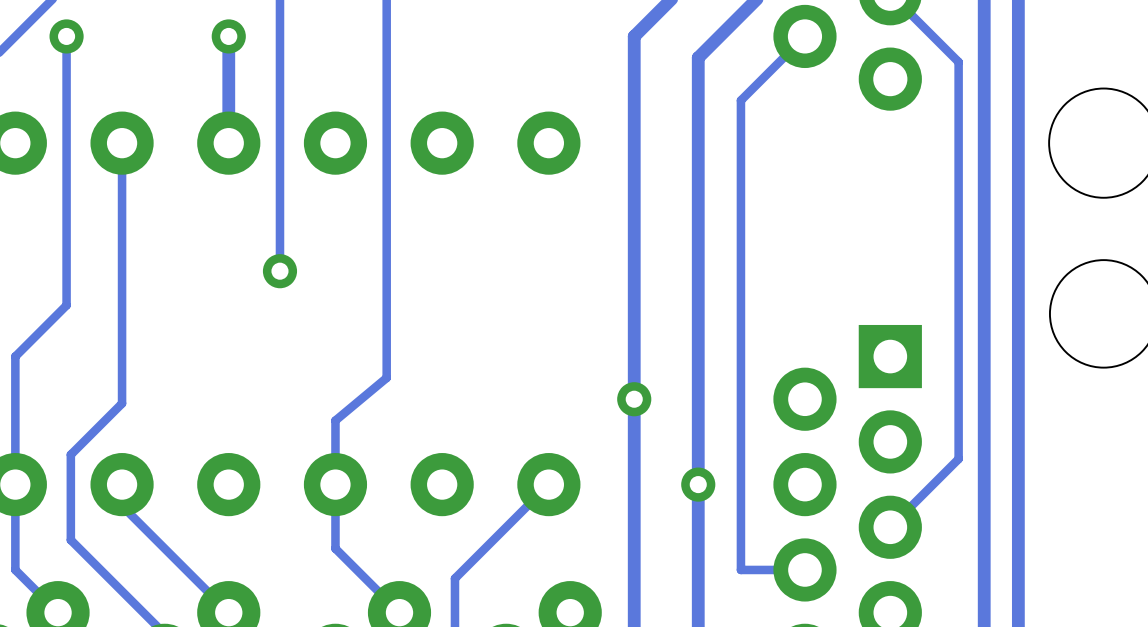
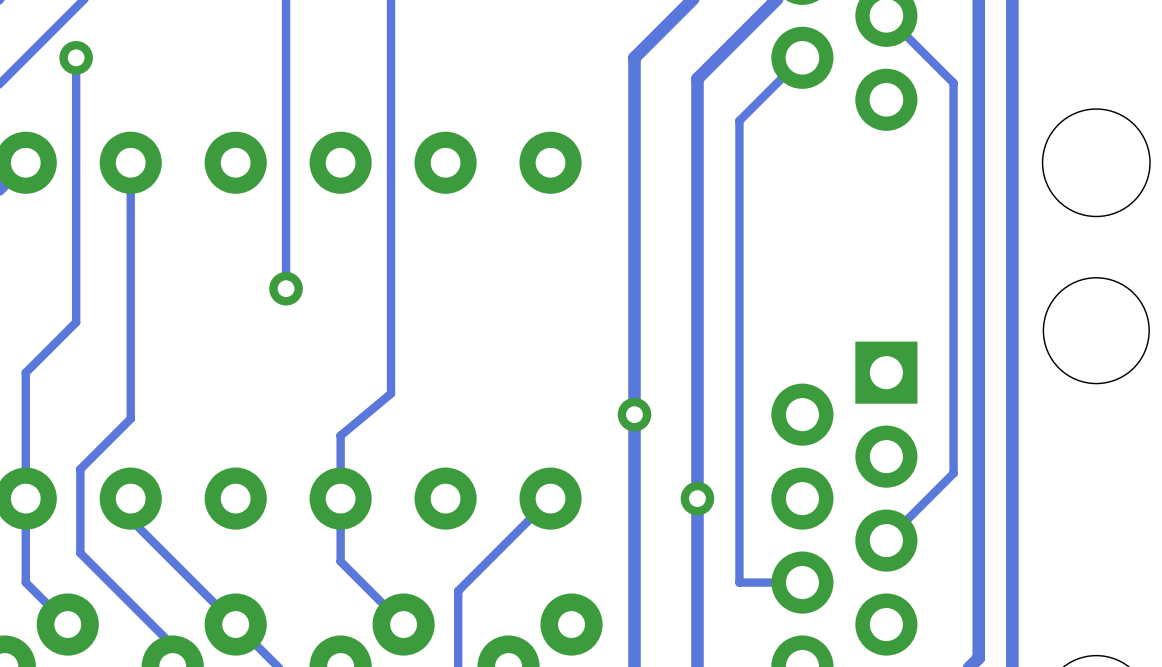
track: (228, 36) (228, 143) -> none
via: (228, 36) -> none

